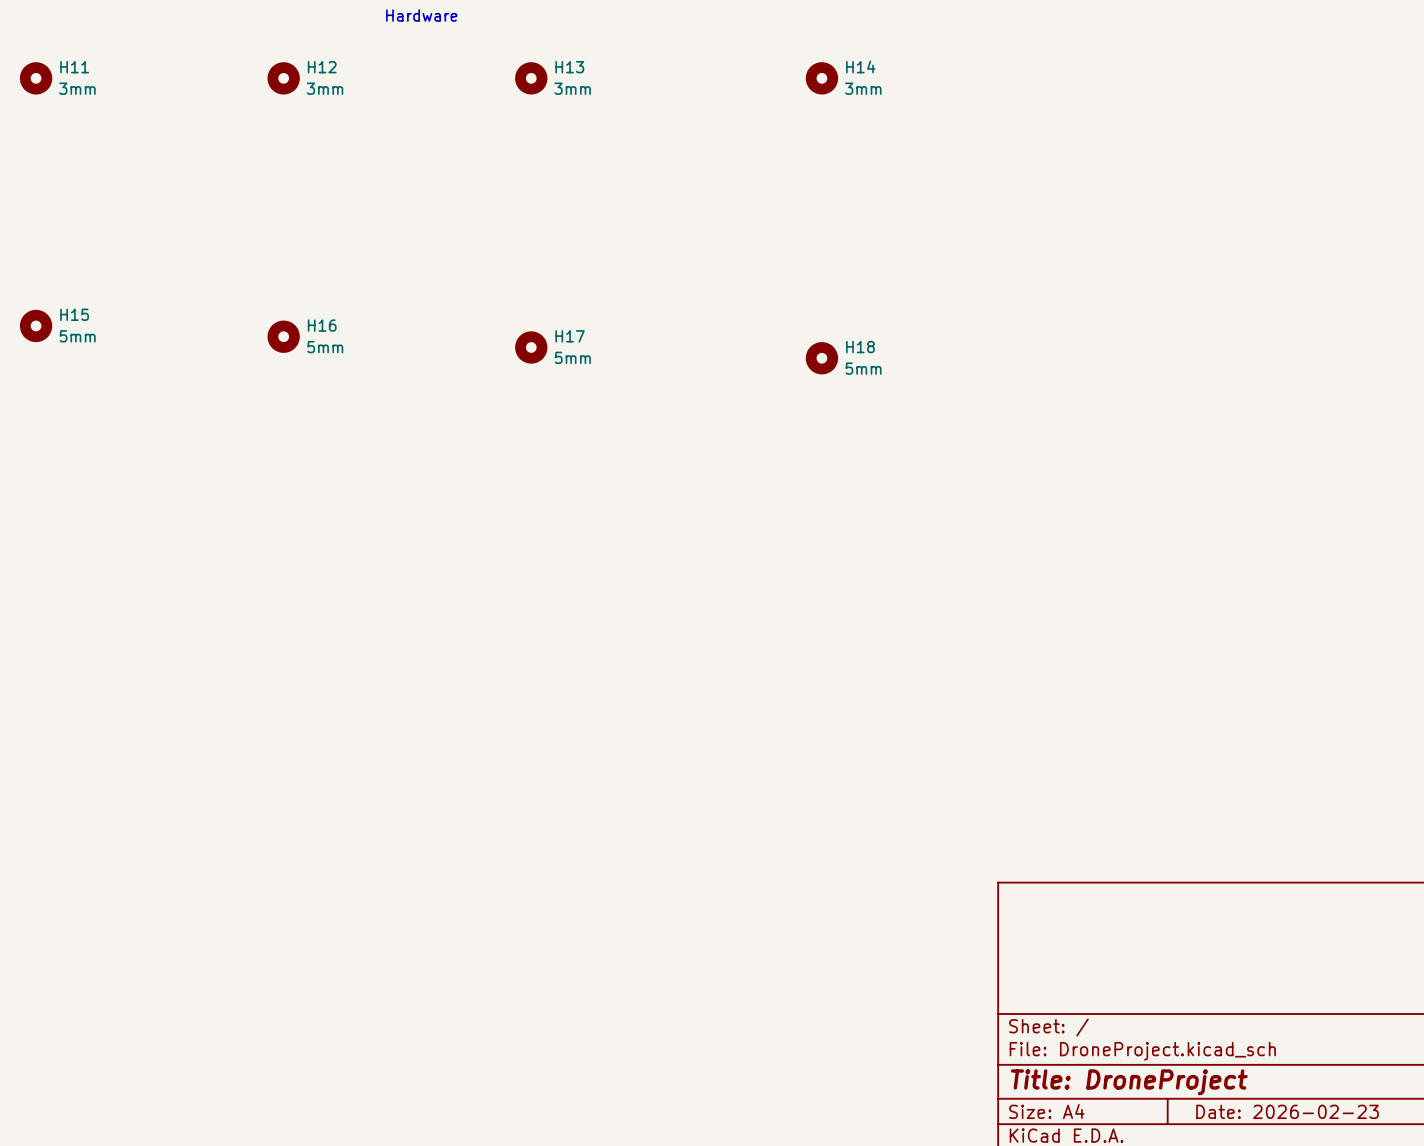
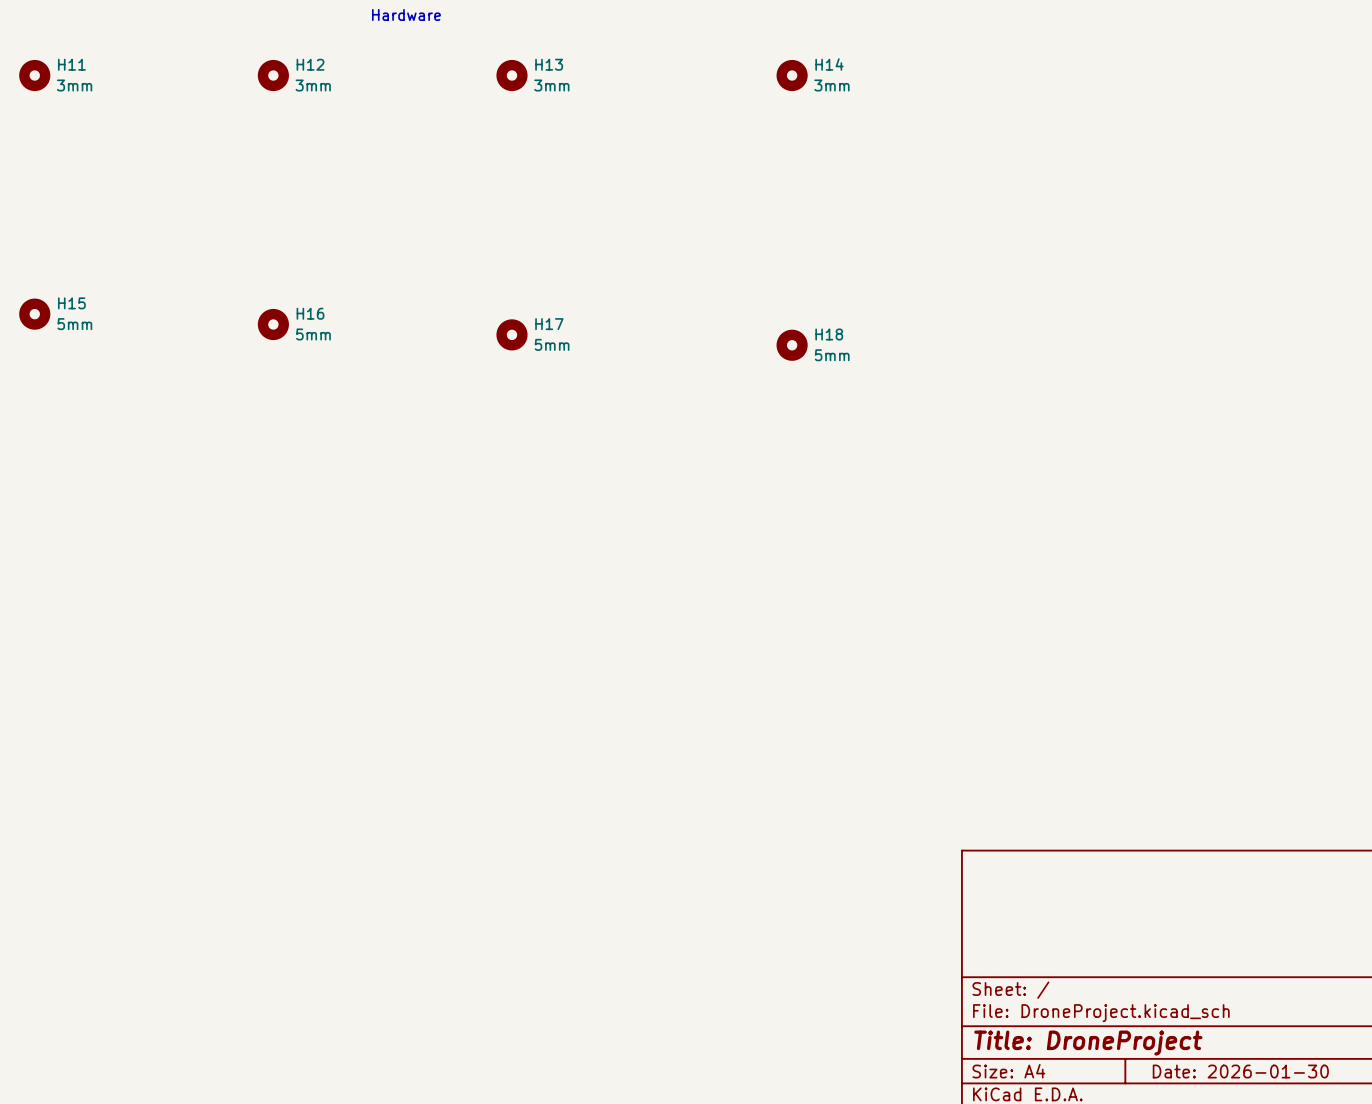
title block: Date: 2026-02-23 (1287, 1111) -> Date: 2026-01-30 (1240, 1071)

